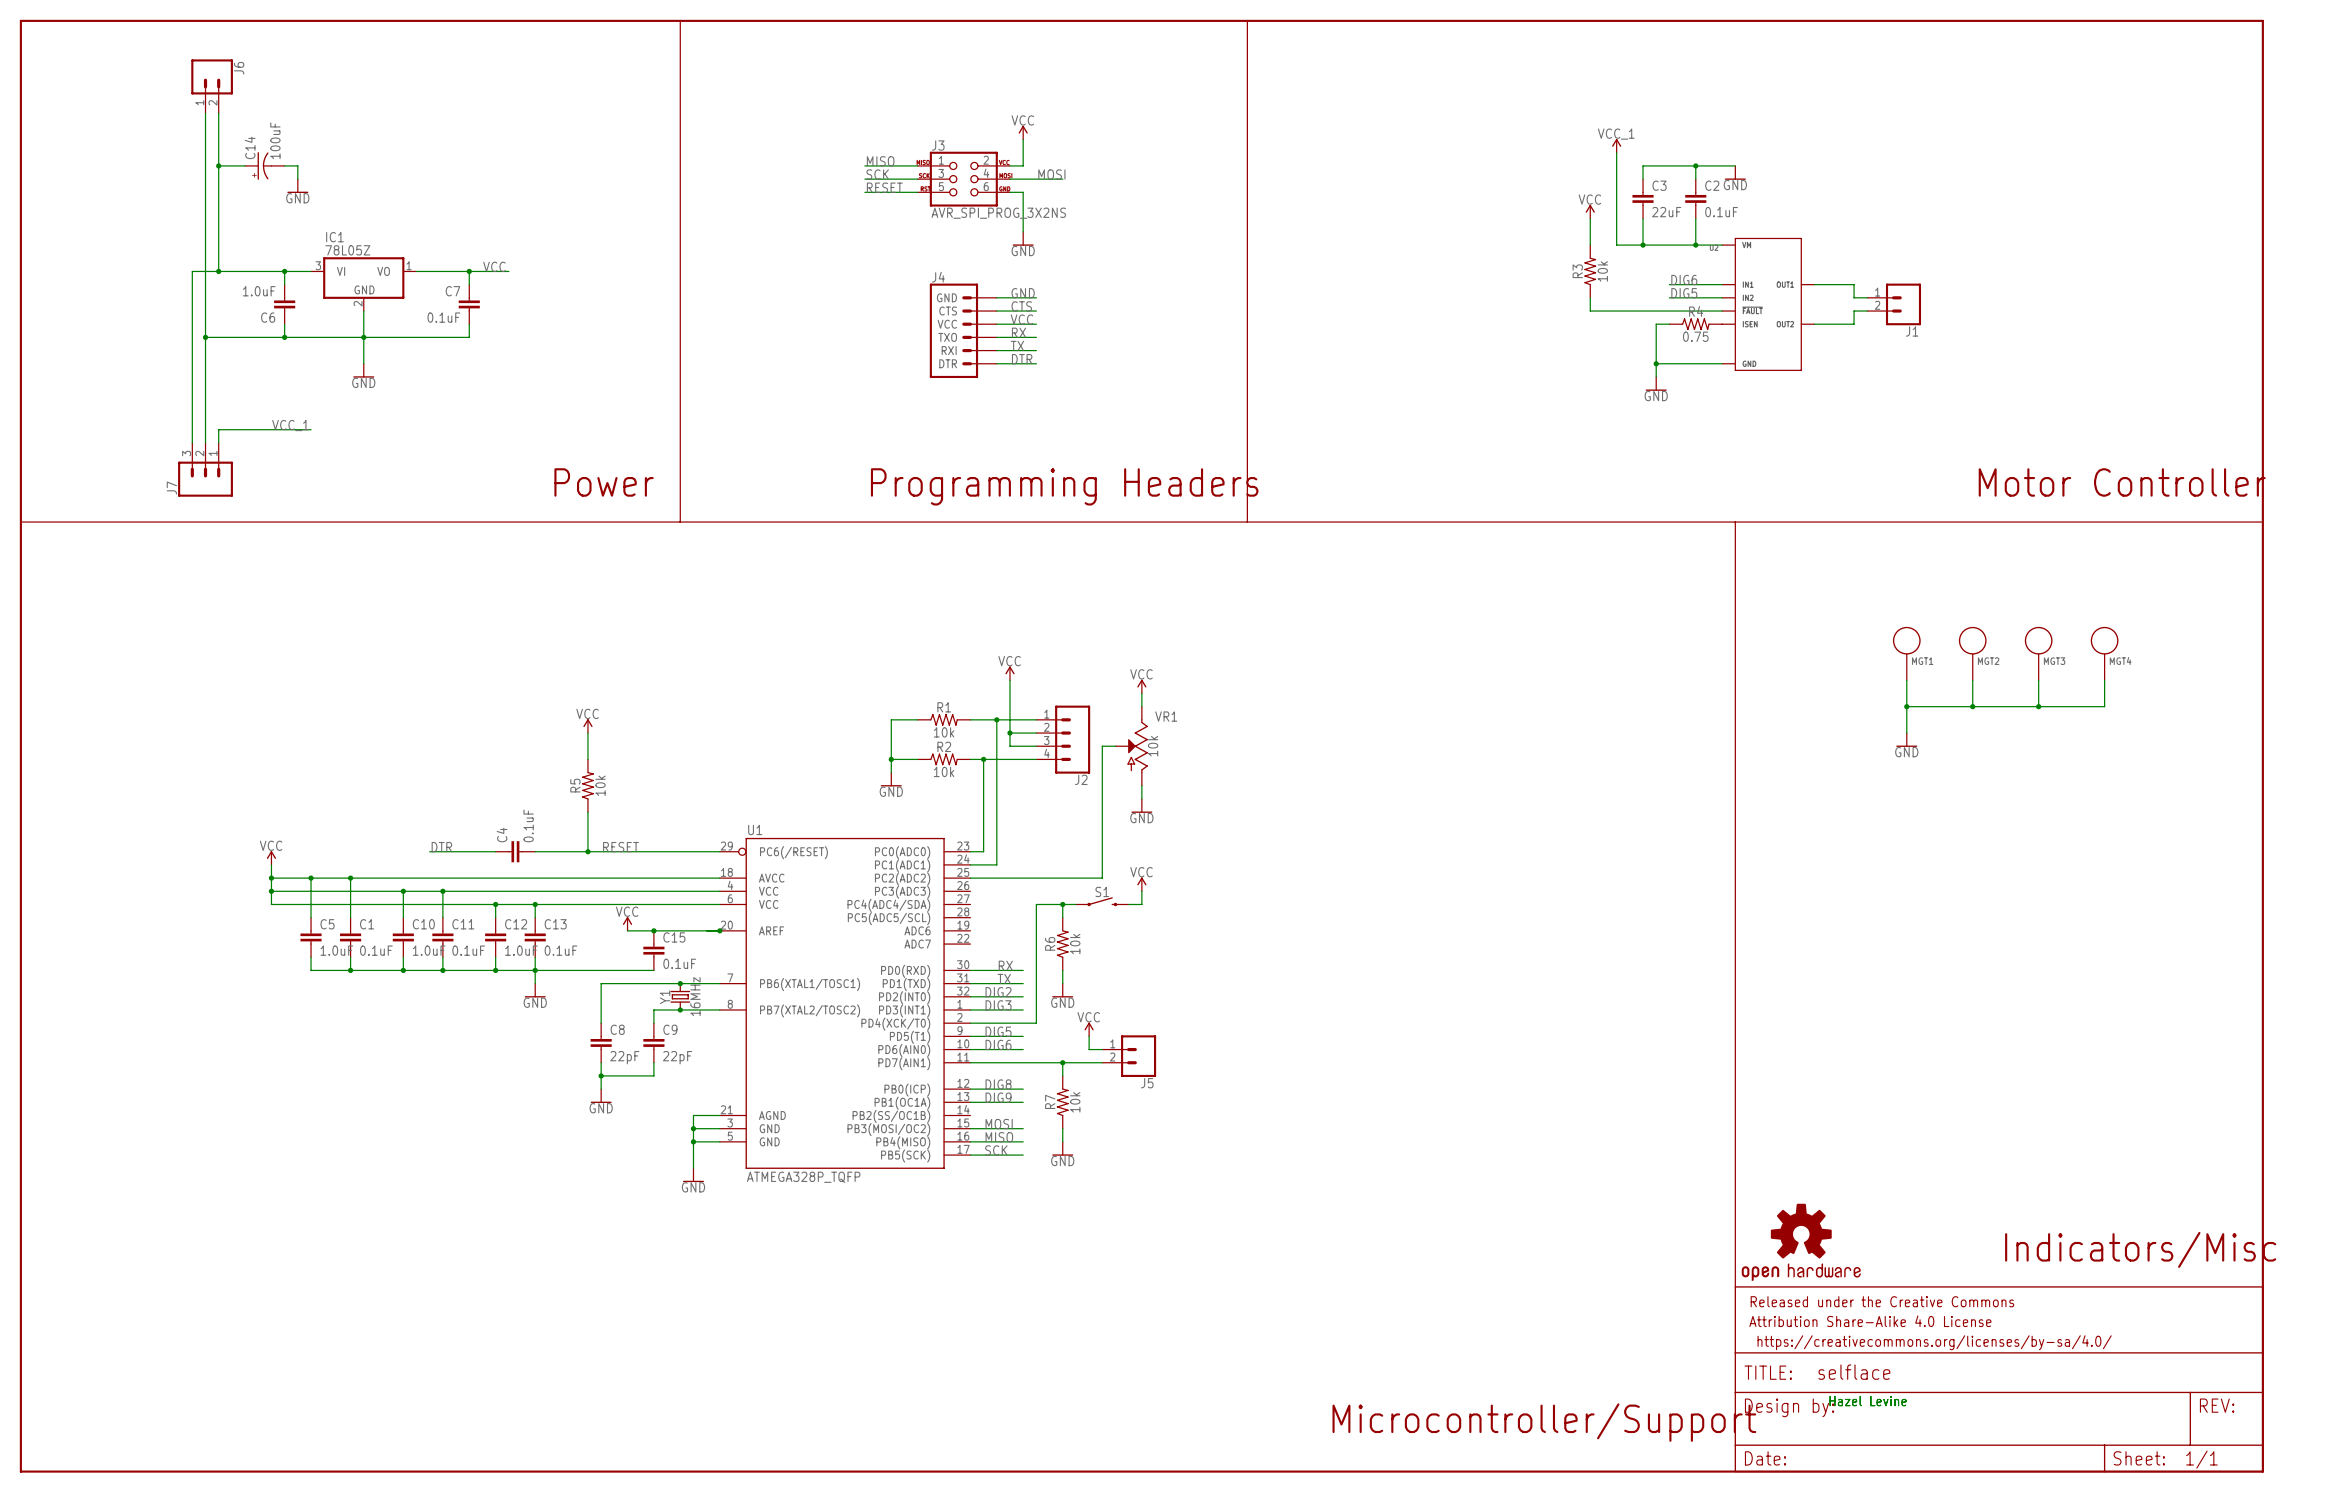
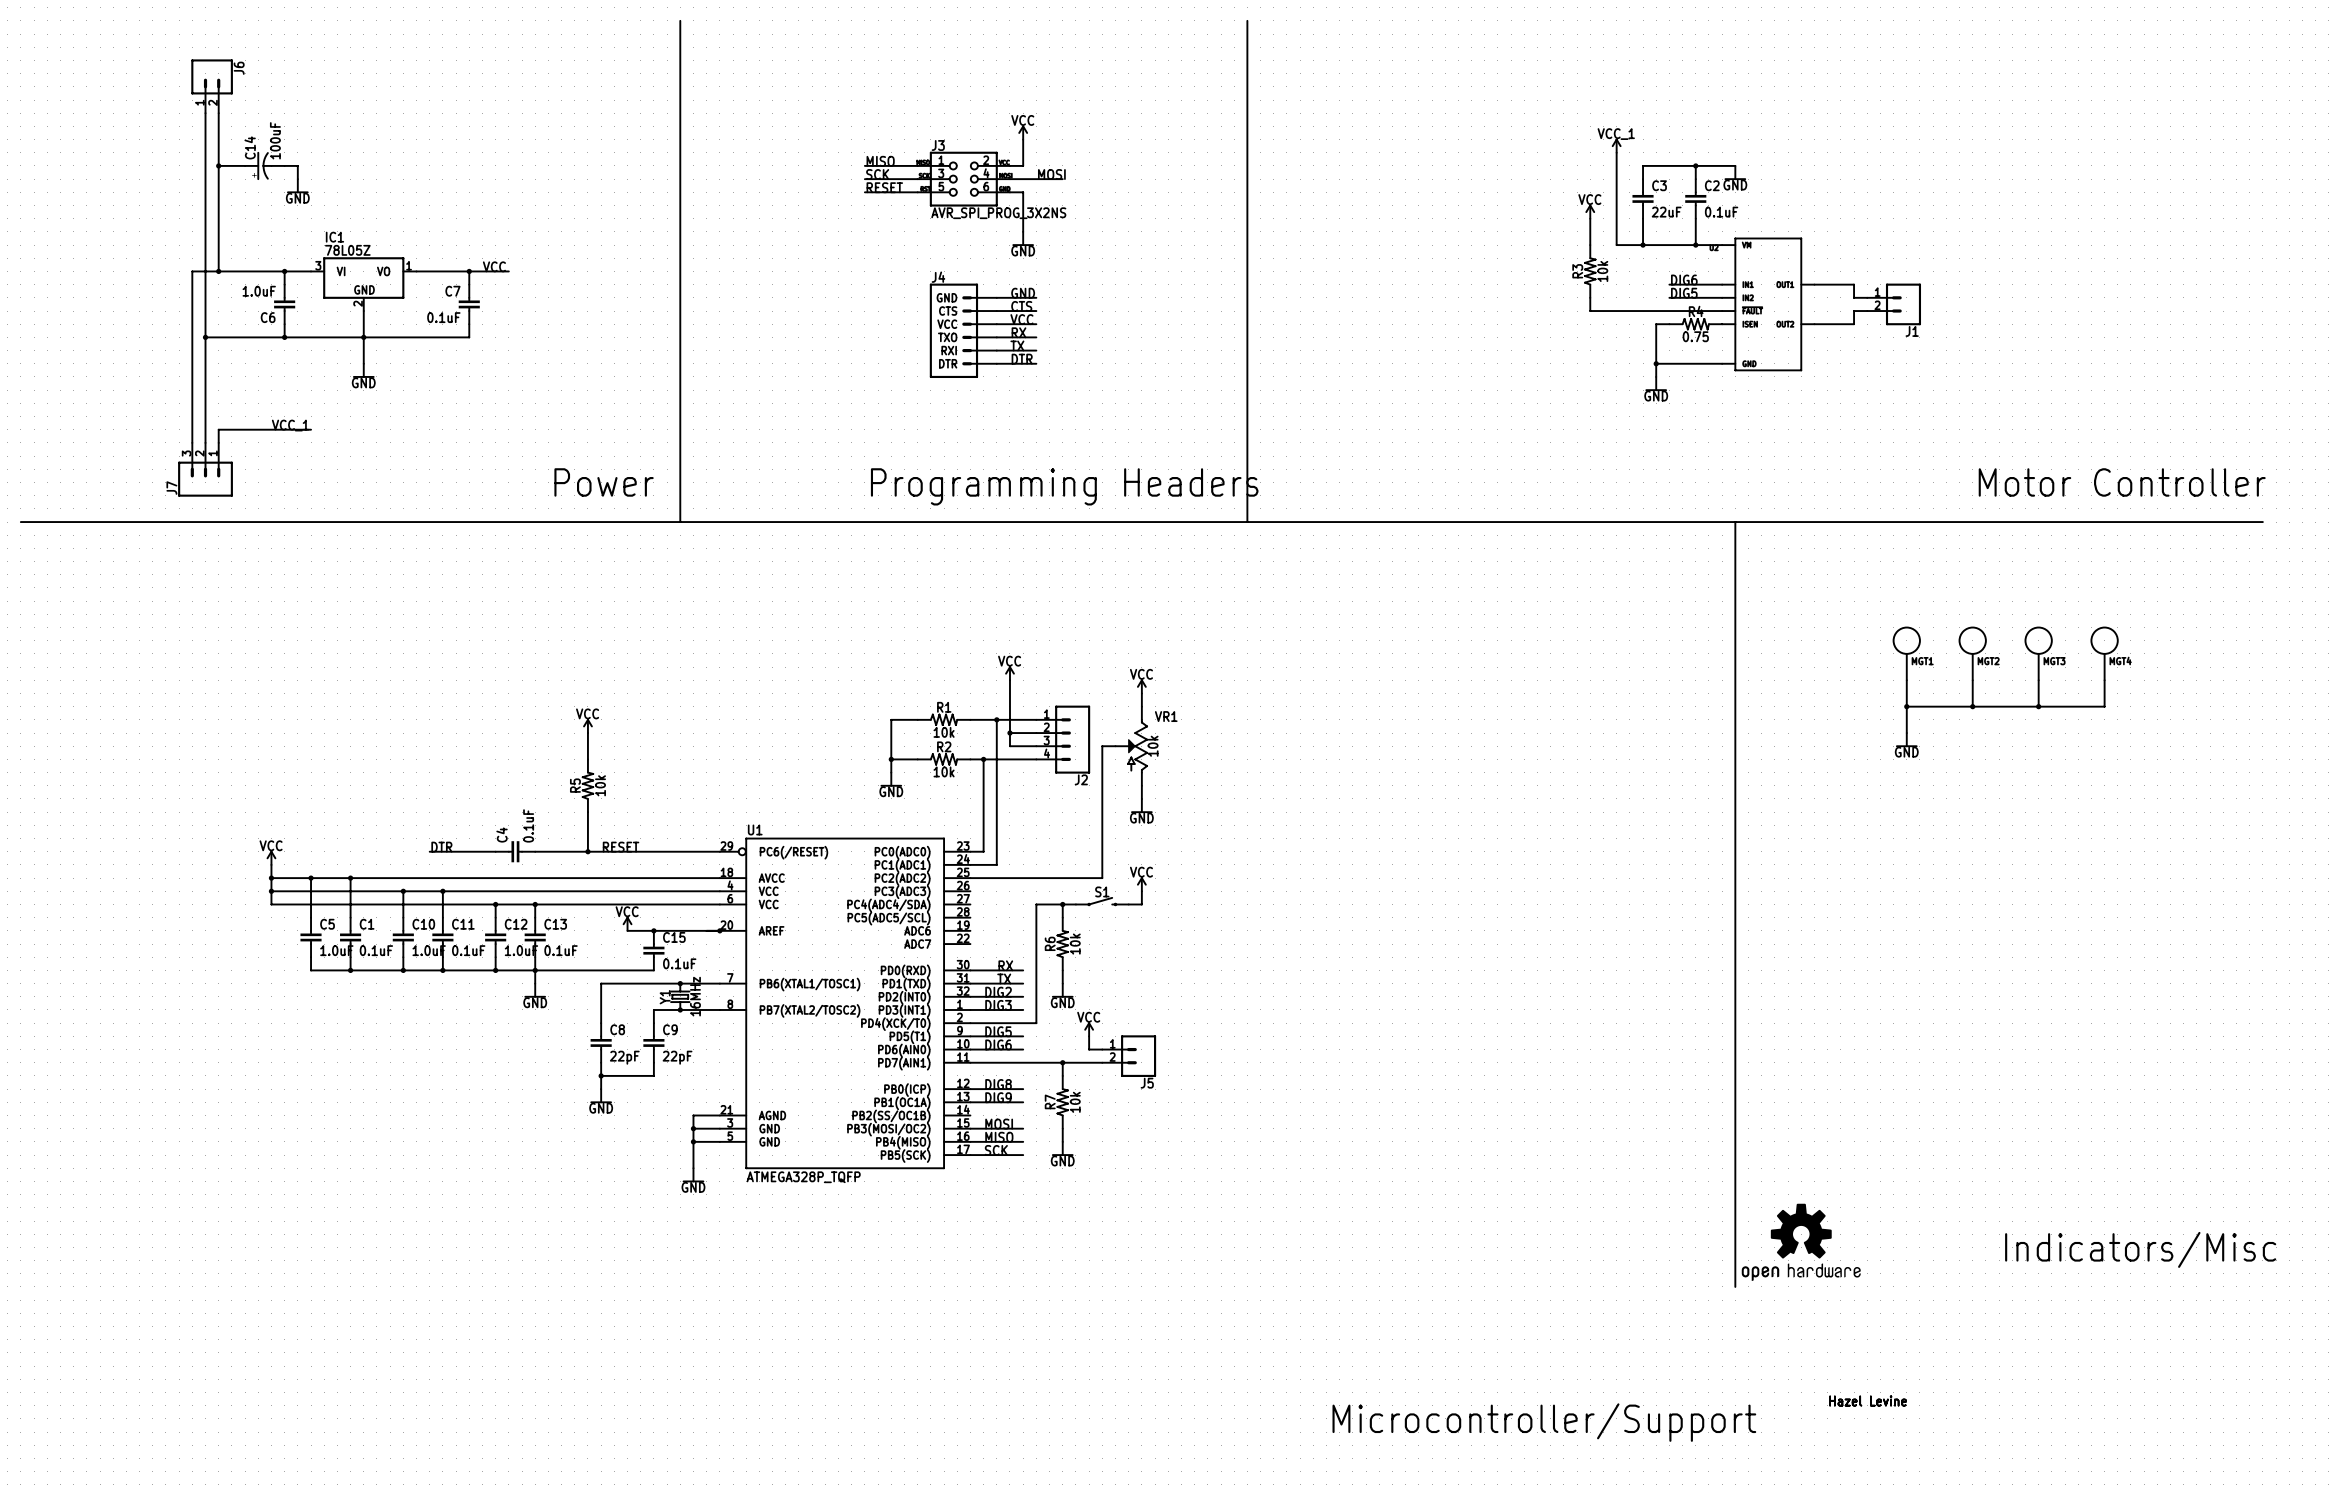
part: (1141, 746) -> none
part: (1999, 1379) -> none

